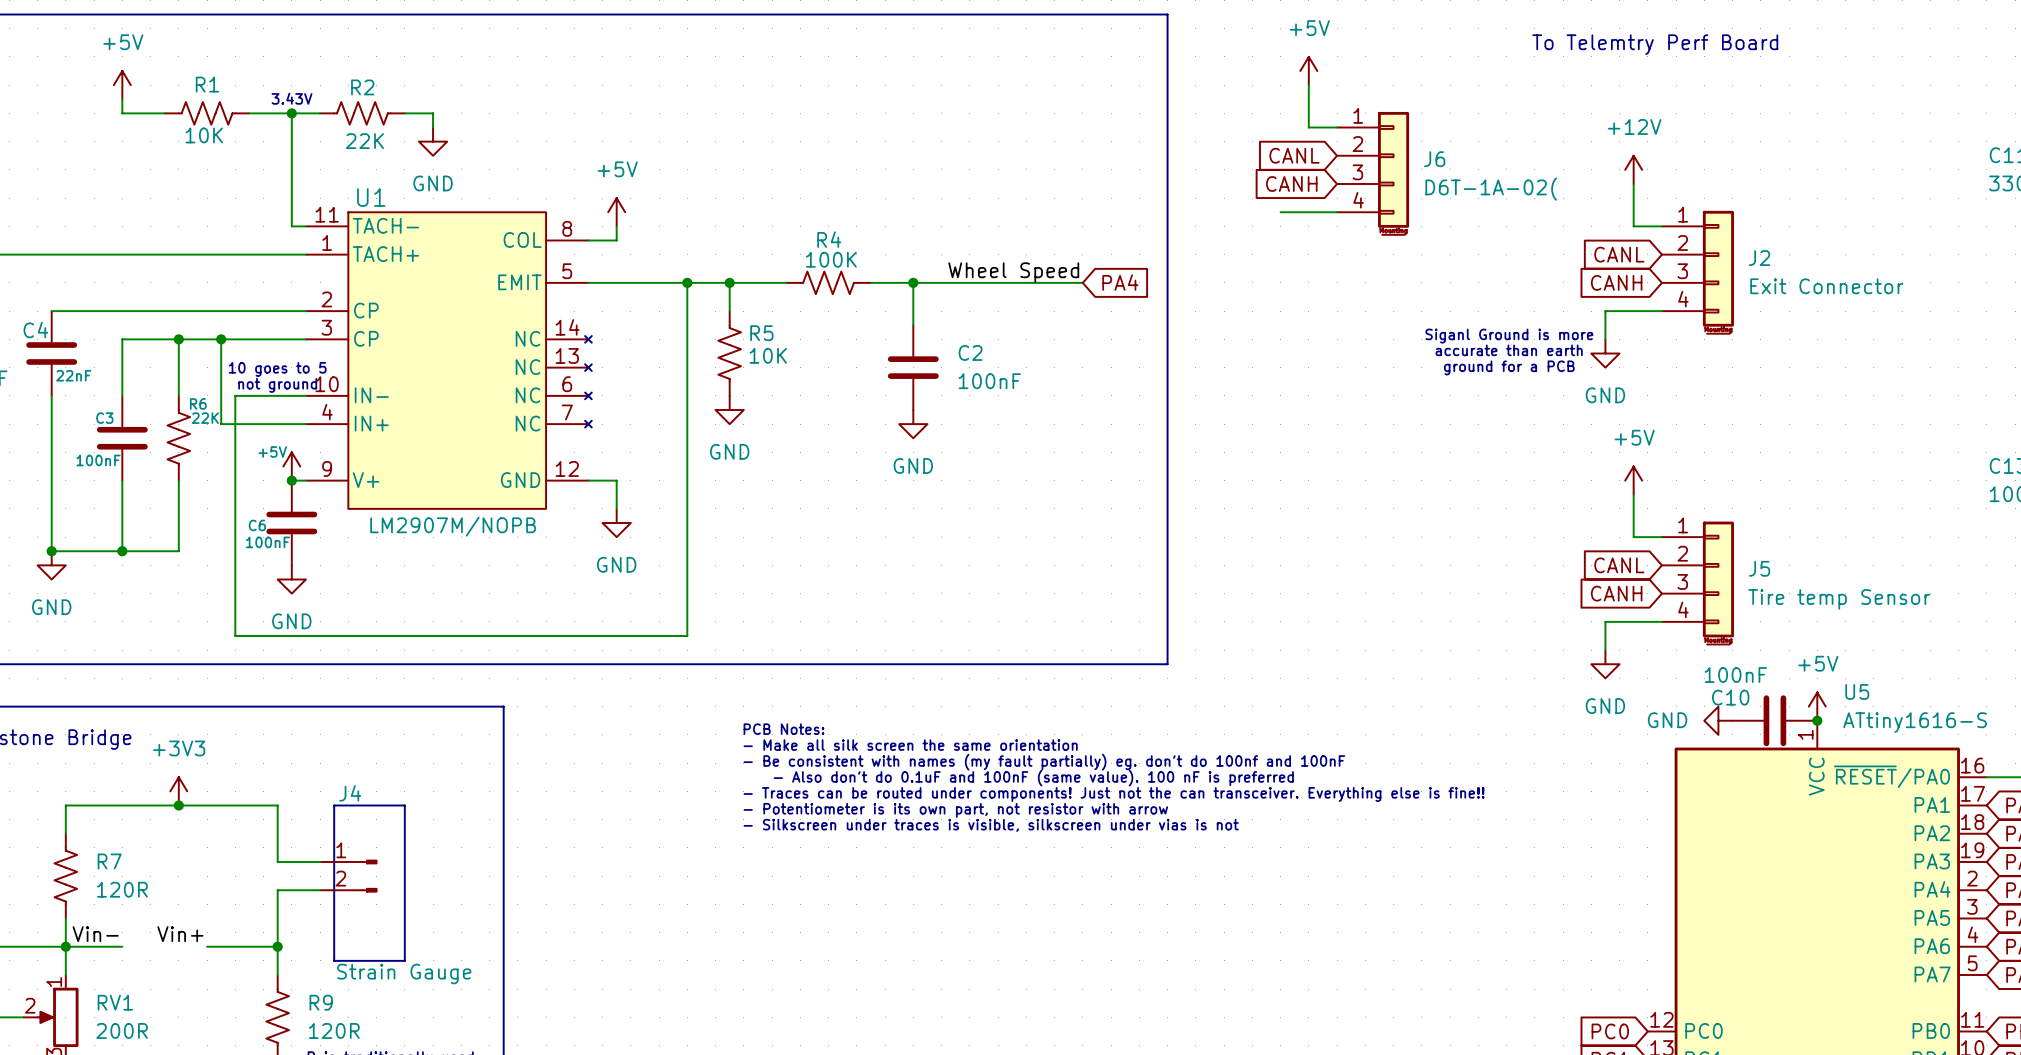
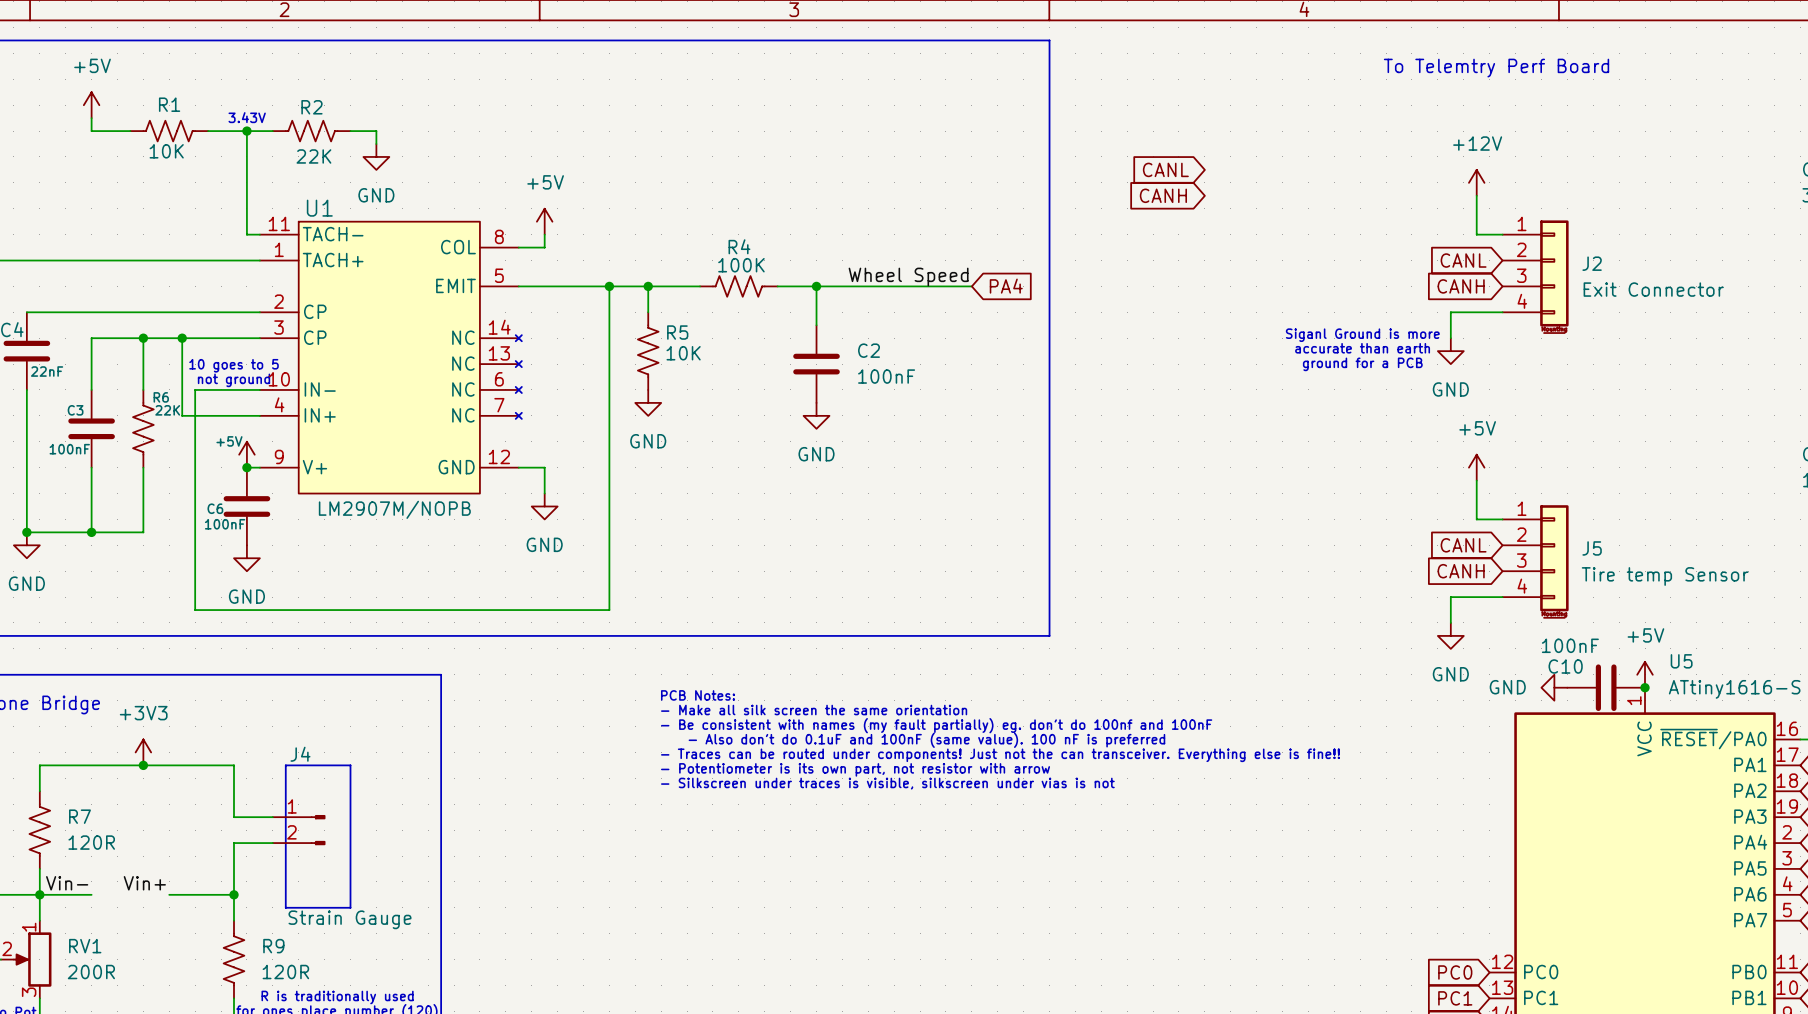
power symbol: +5V (1308, 71) -> none
wire: (1308, 85) (1308, 127) (1337, 127) -> none
J6: D6T-1A-02( (1373, 173) -> none
wire: (1280, 212) (1337, 212) -> none

